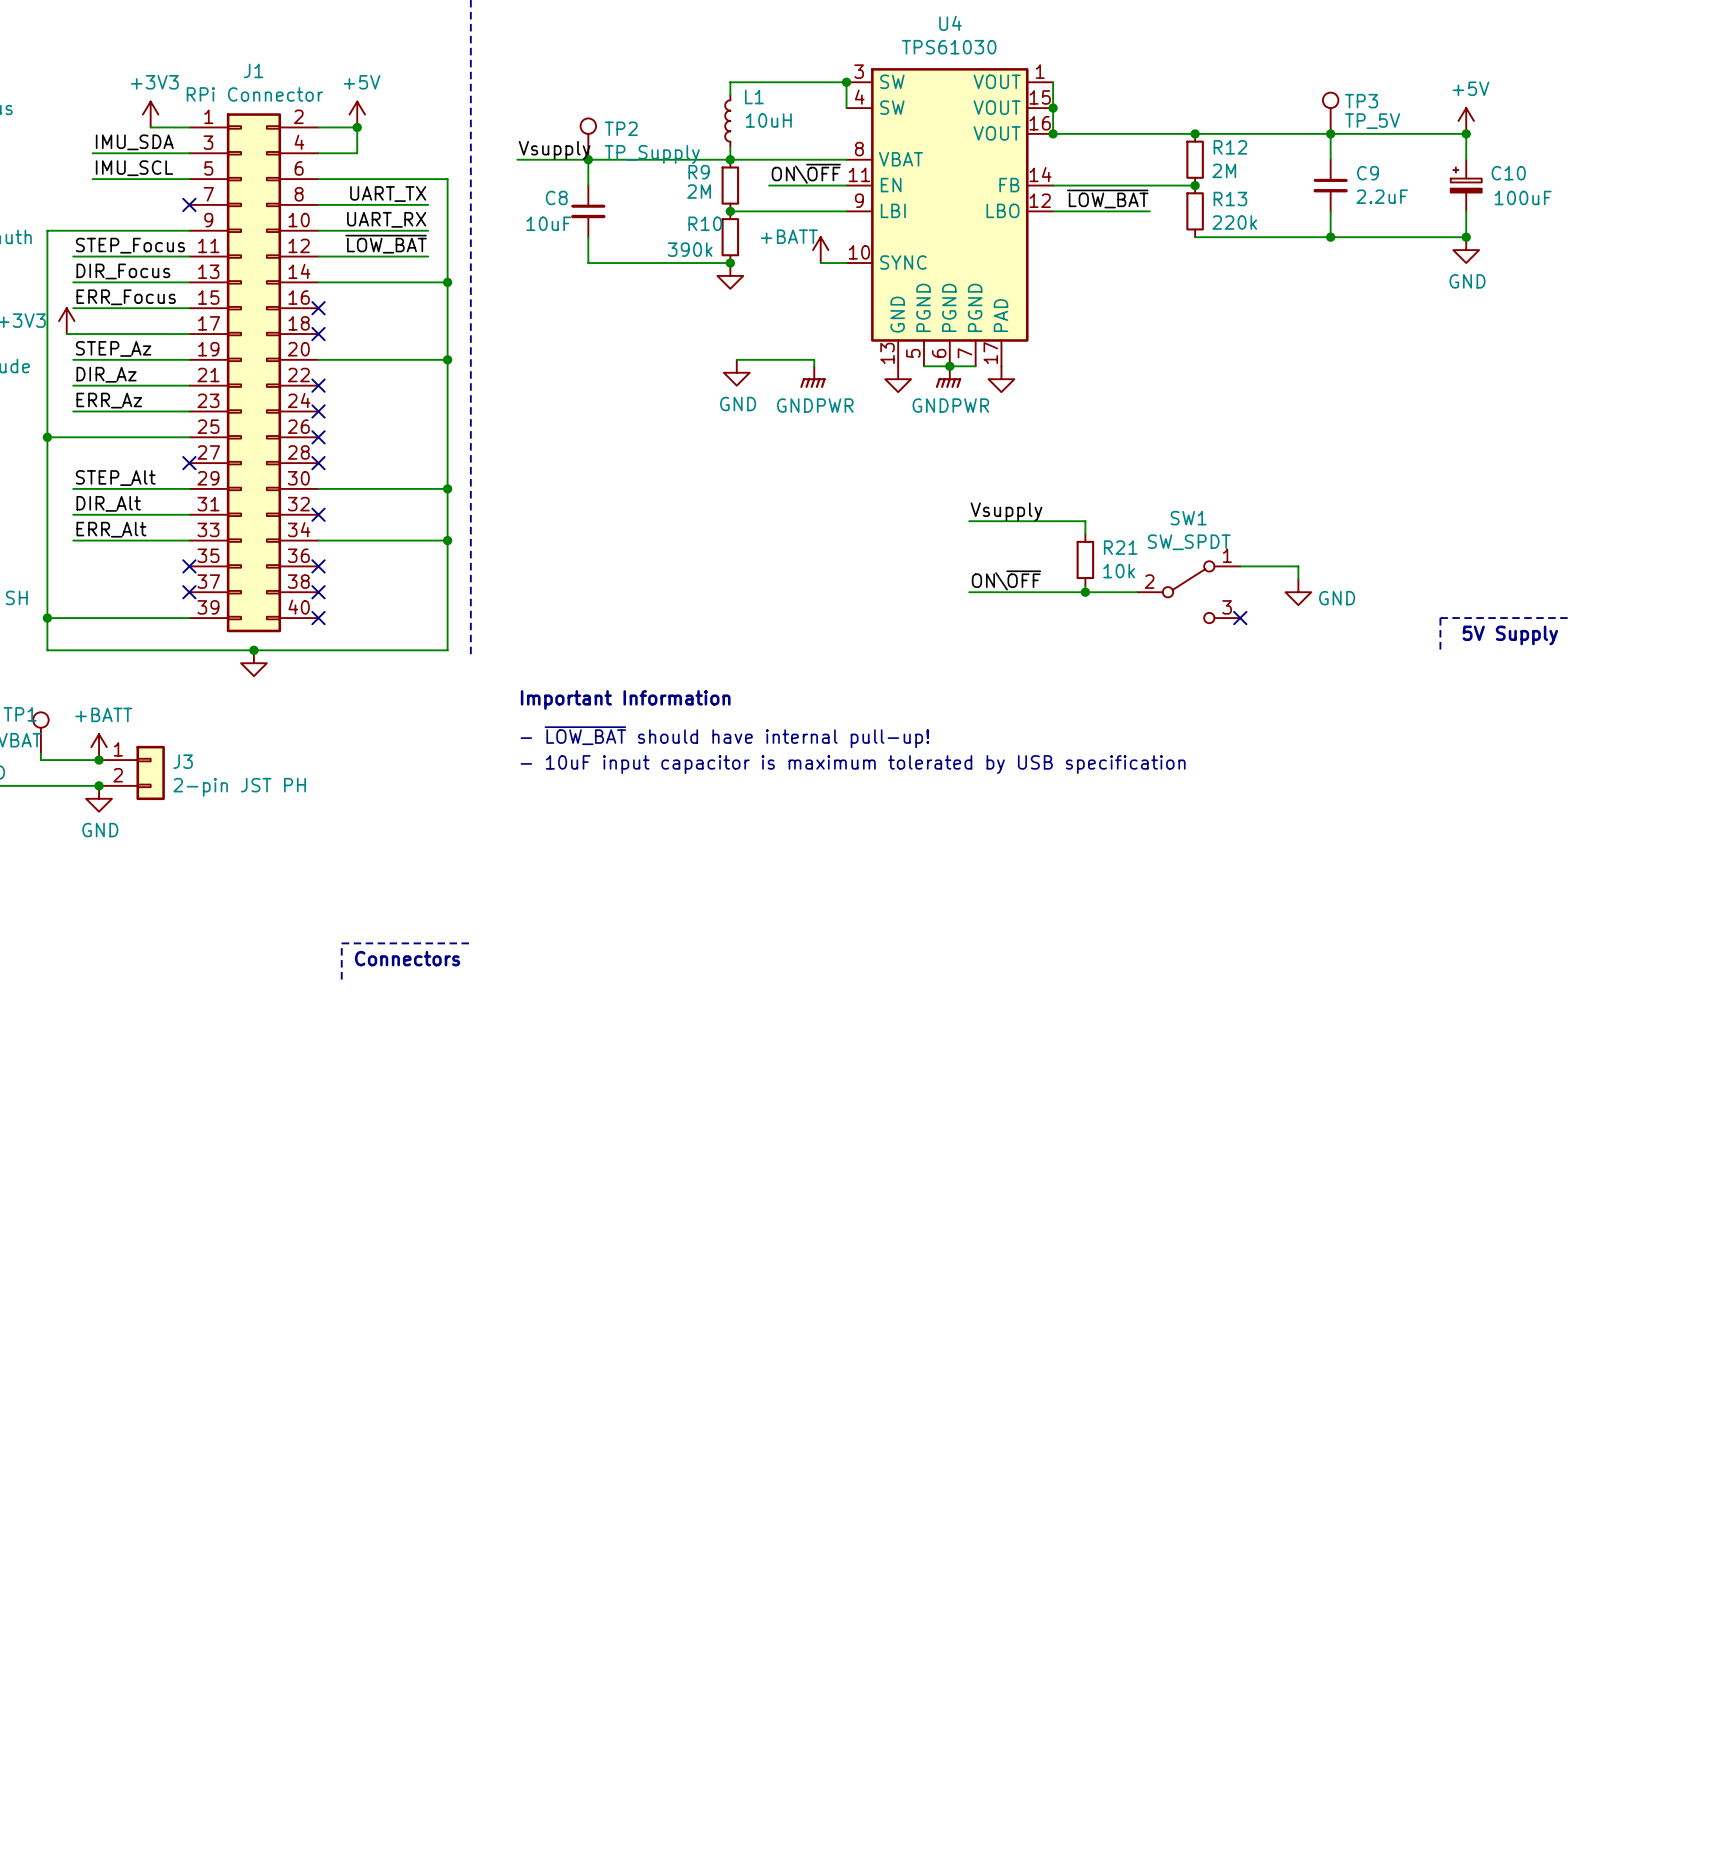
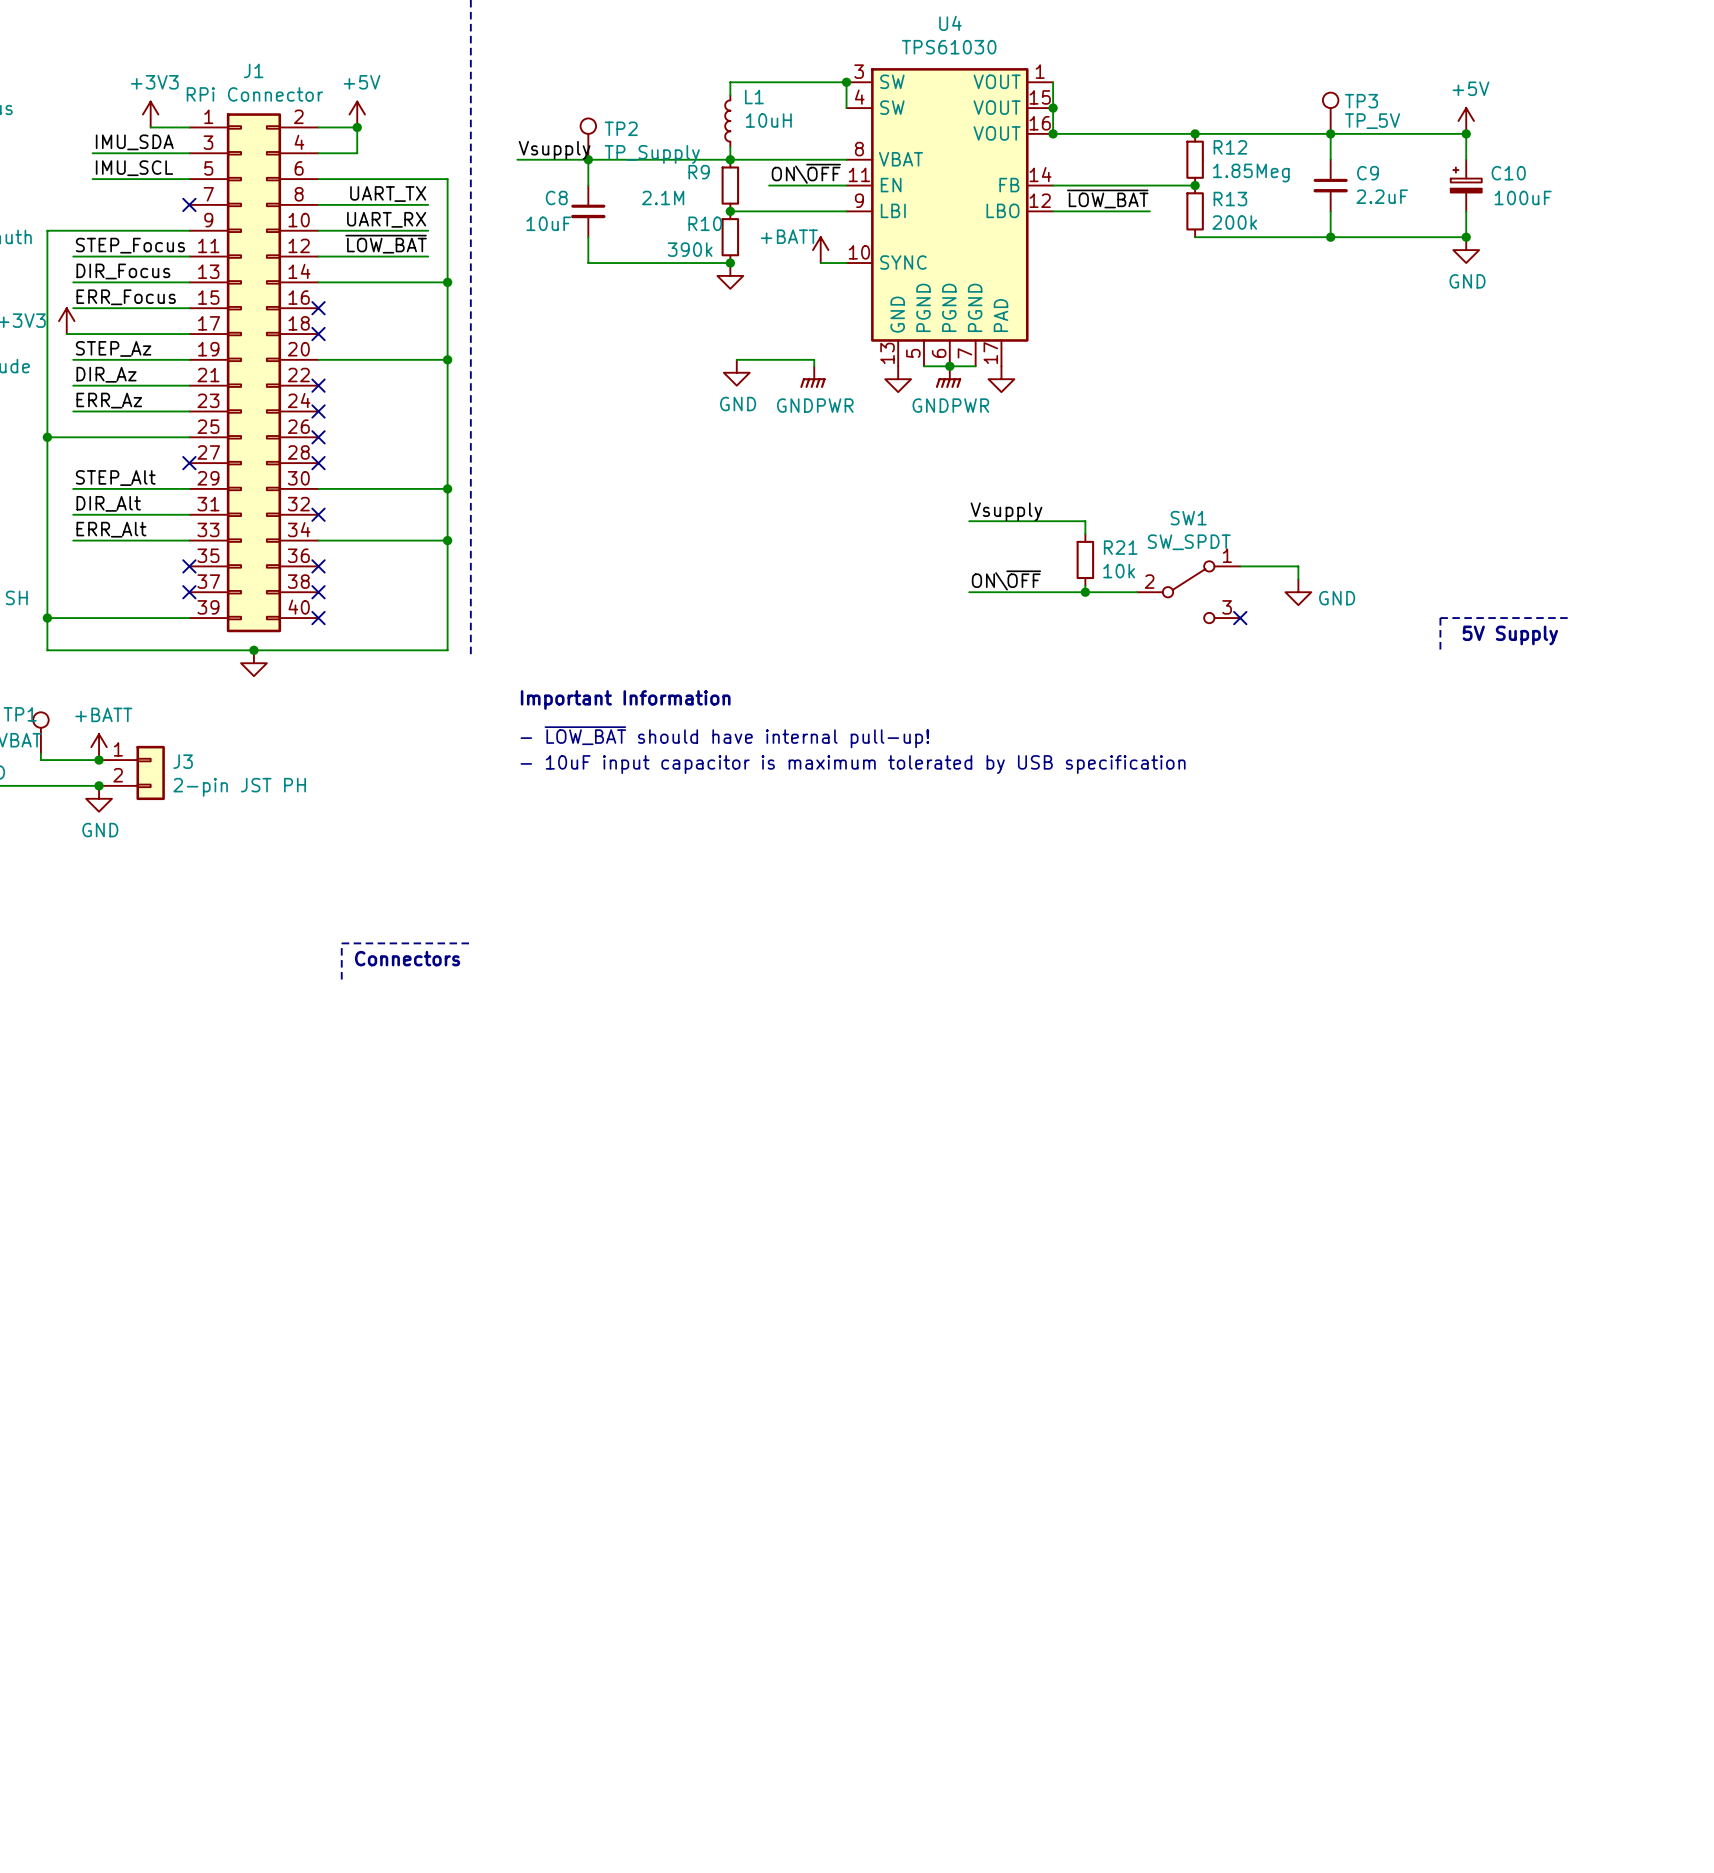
R12 value: 2M (1224, 170) -> 1.85Meg (1251, 173)
R9 value: 2M (699, 191) -> 2.1M (663, 197)
R13 value: 220k (1234, 222) -> 200k (1234, 222)

